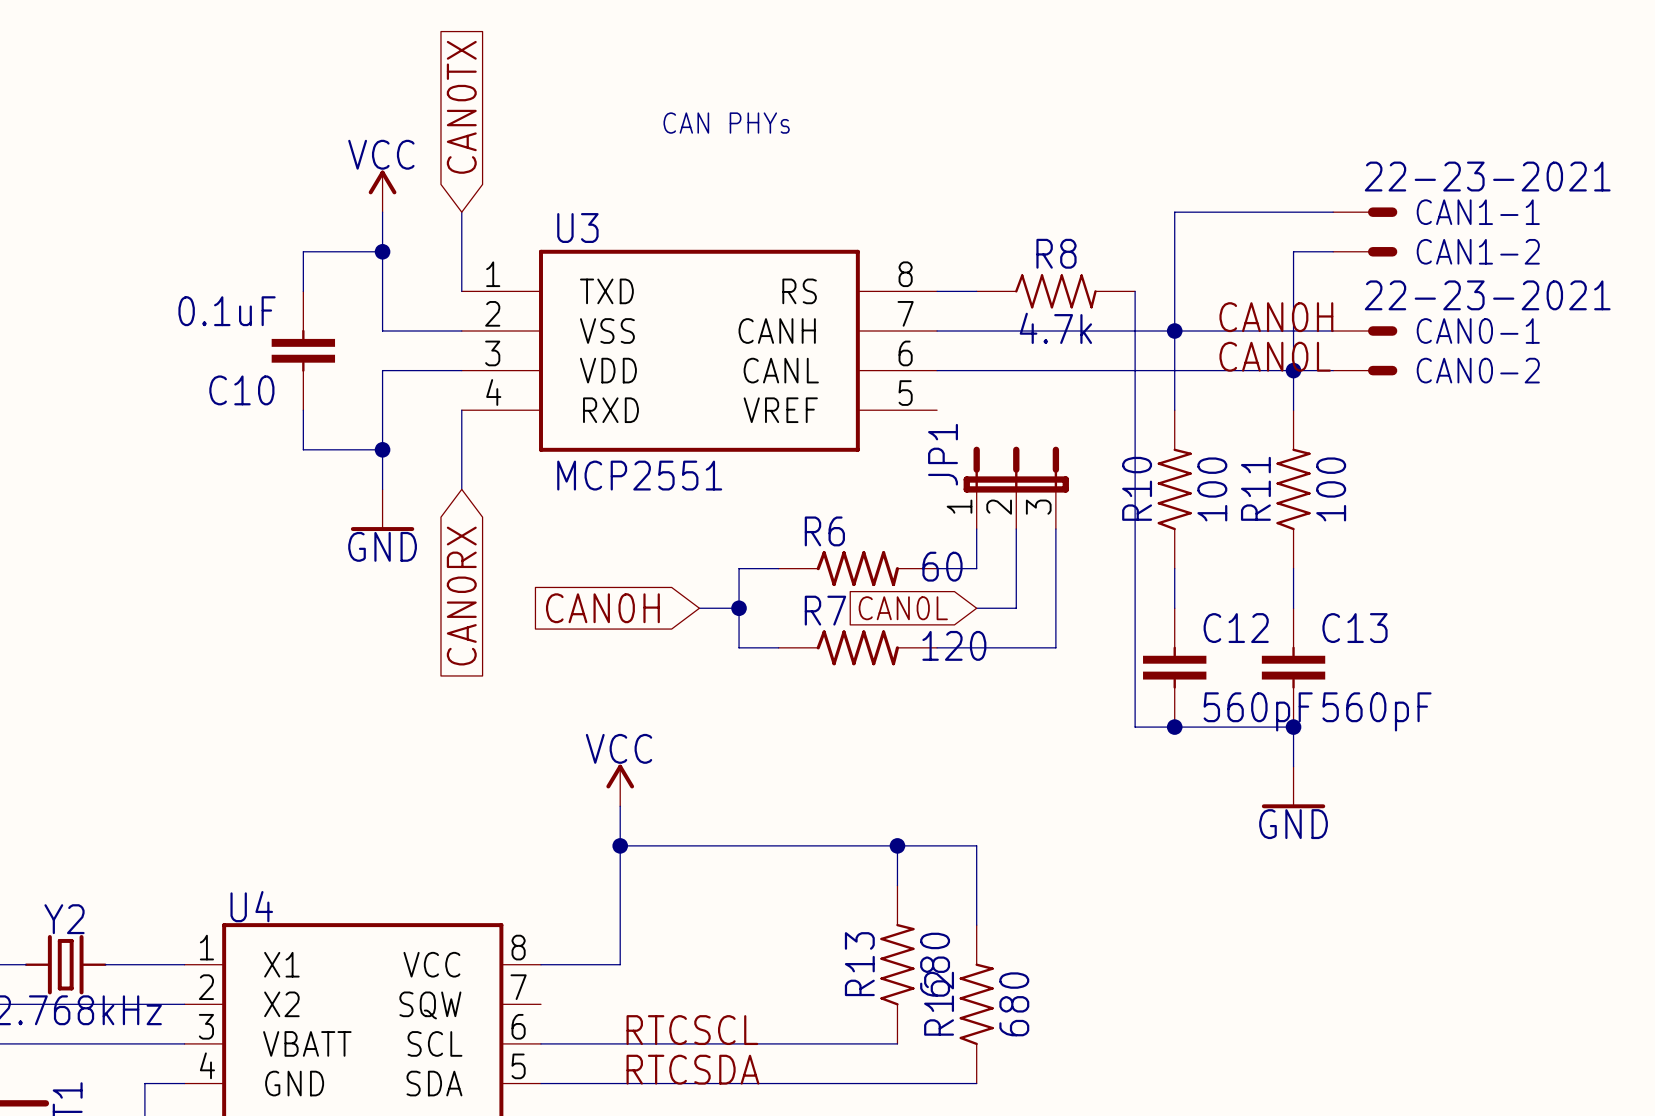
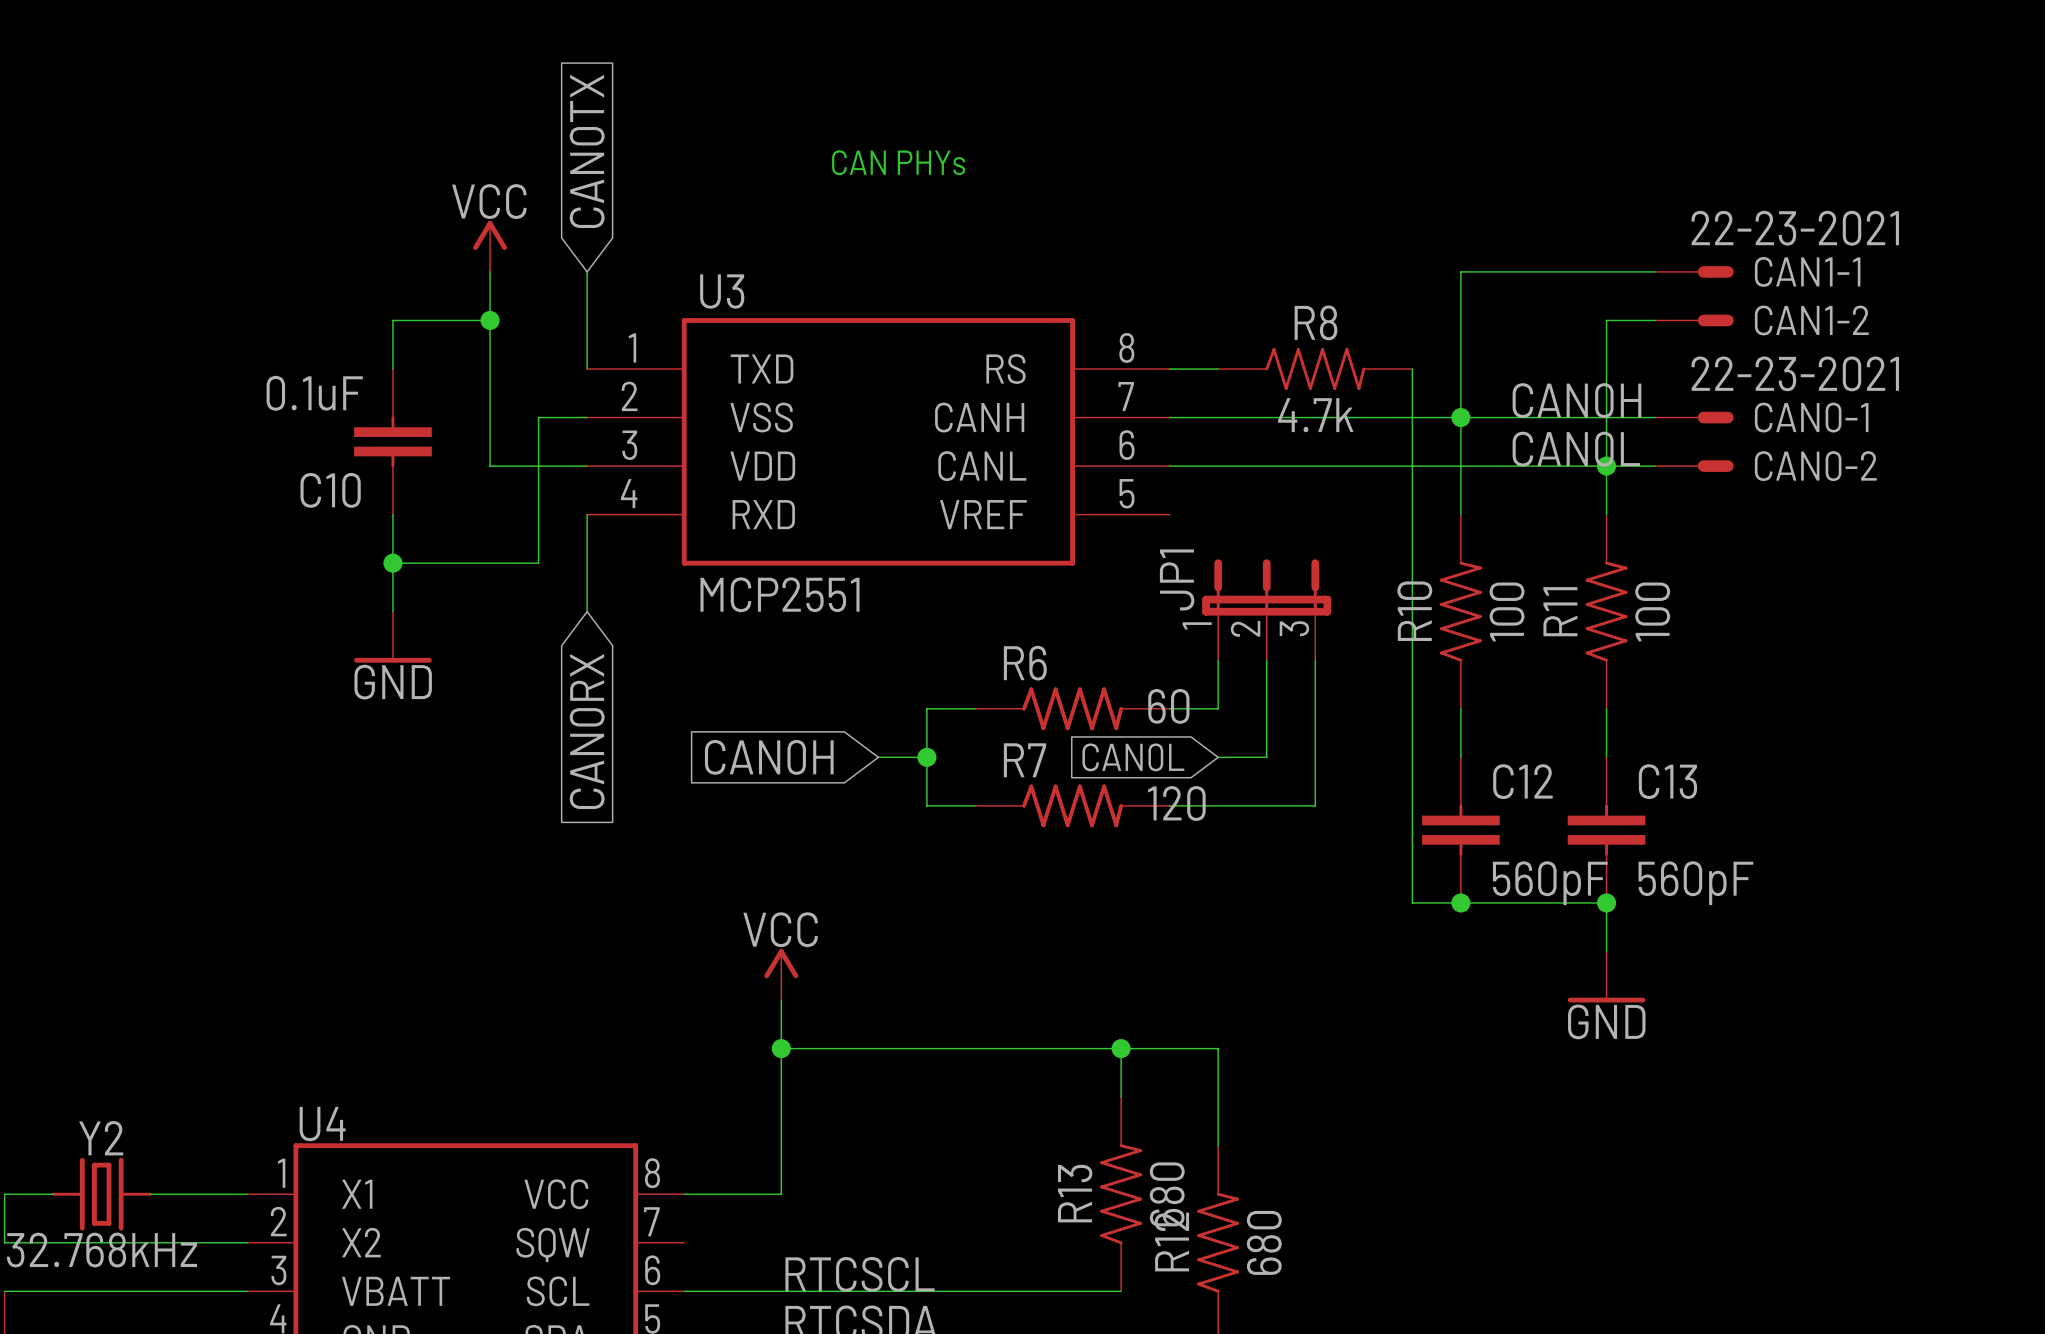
wire: (382, 331) (422, 331) -> (490, 417) (490, 466)
wire: none -> (538, 417) (538, 563) (490, 563)
wire: (382, 370) (382, 489) -> none
wire: none -> (392, 563) (392, 611)
junction position: (382, 449) -> (392, 563)
power symbol position: GND (382, 510) -> GND (392, 637)

